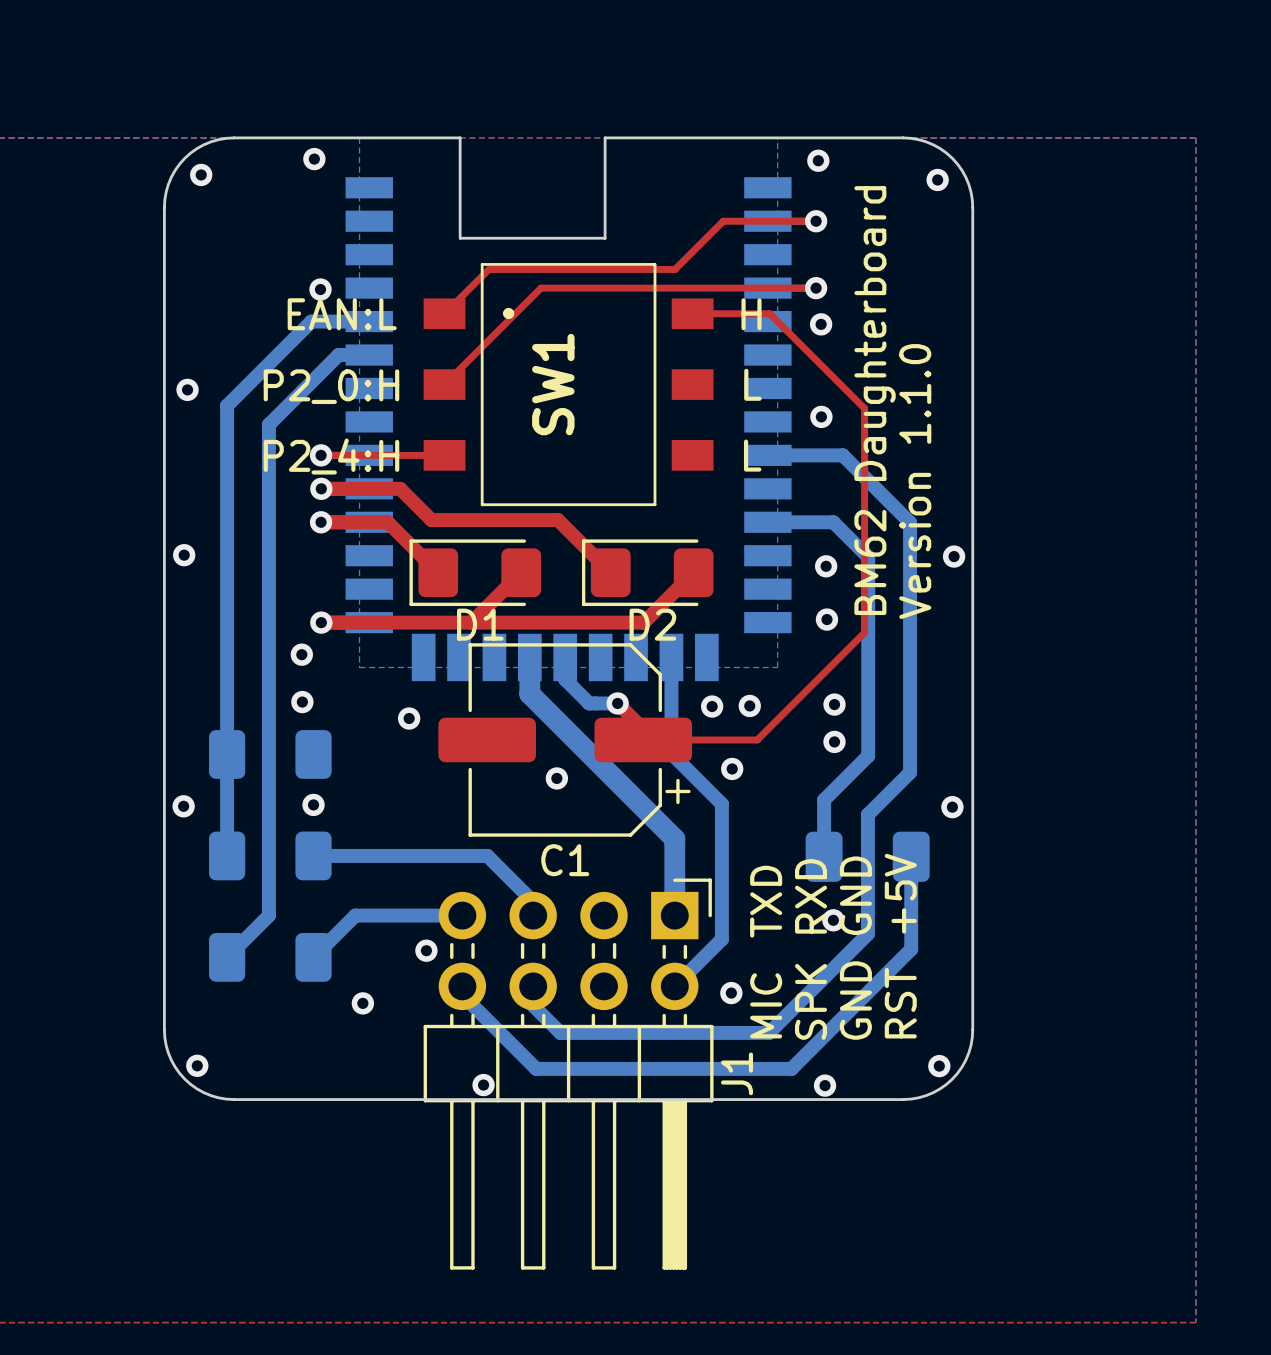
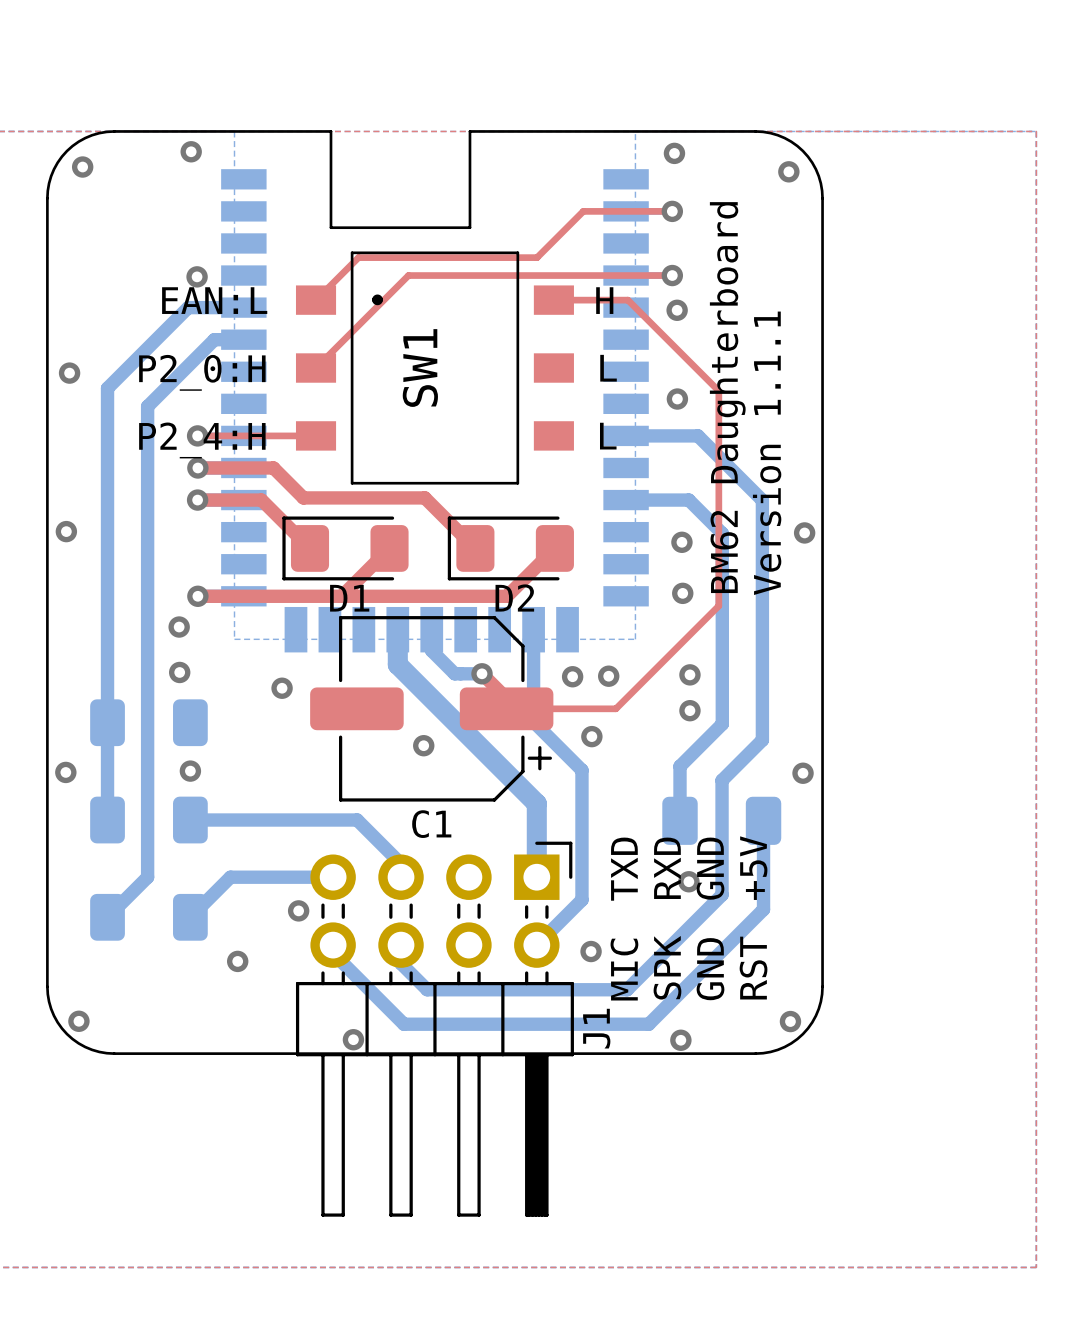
text: Version 1.1.0 (915, 481) -> Version 1.1.1 (767, 453)

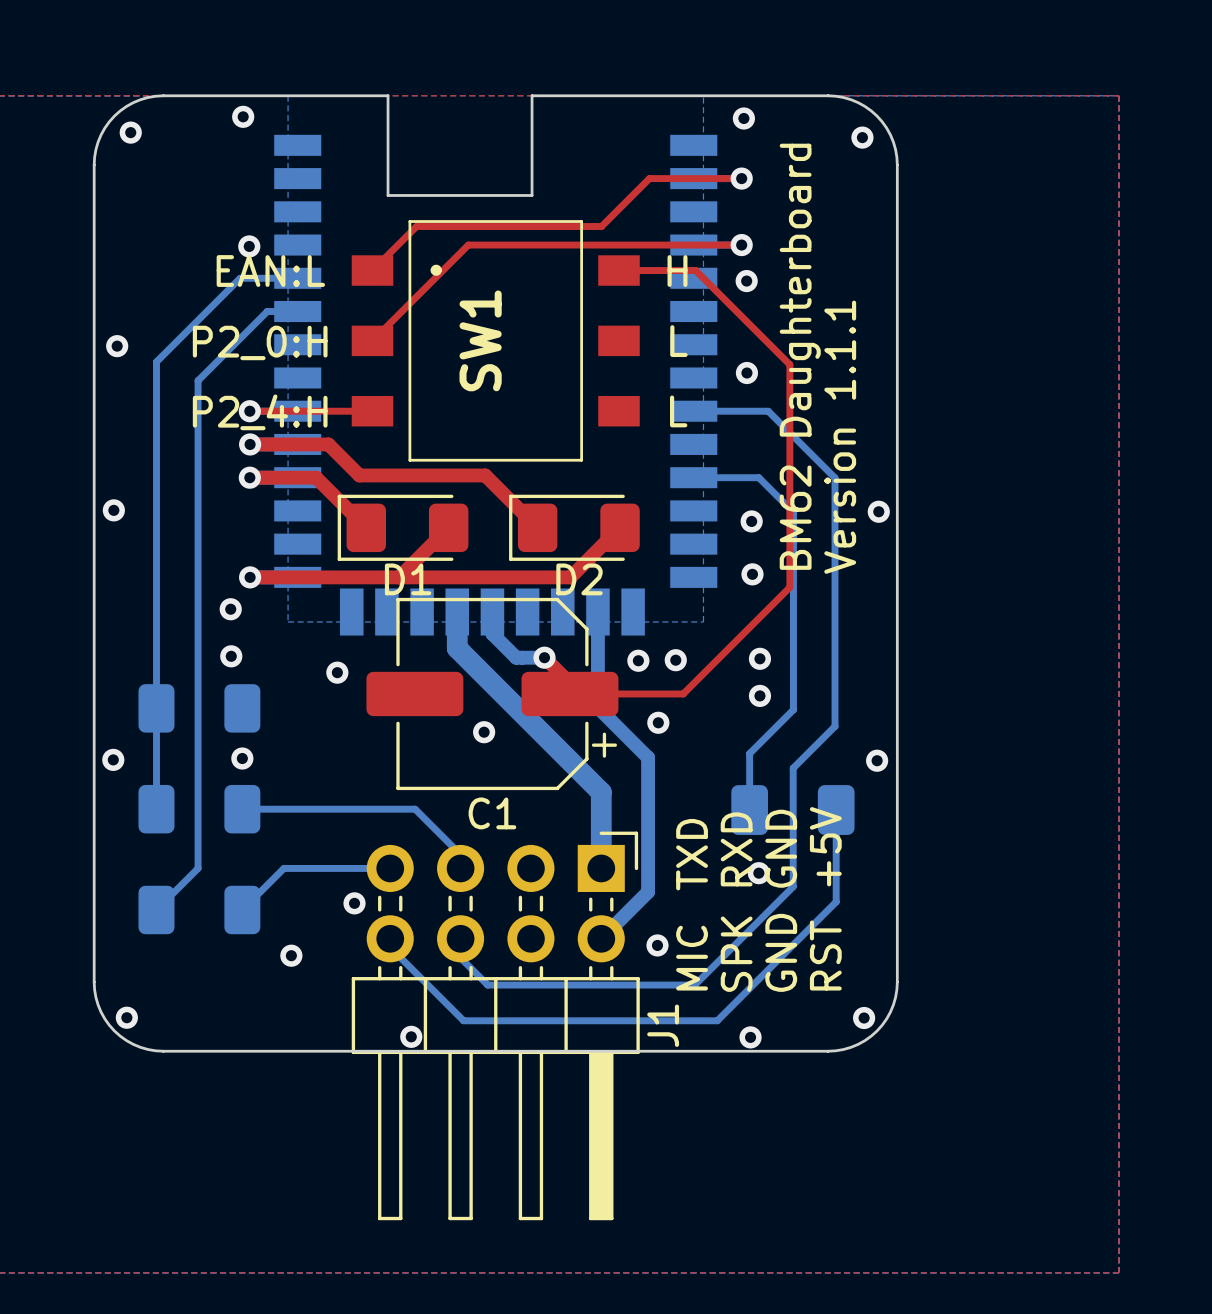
bottom track width: thick (243, 307) (188, 307) (107, 388) (107, 820) -> thin (297, 278) (240, 278) (156, 361) (156, 809)
bottom track width: thick (243, 339) (214, 339) (147, 406) (147, 877) (107, 917) -> thin (297, 311) (267, 311) (198, 380) (198, 868) (156, 910)
bottom track width: thick (626, 435) (697, 435) (762, 500) (762, 740) (722, 780) (722, 894) (627, 989) (427, 989) (401, 963) (401, 945) -> thin (693, 411) (768, 411) (835, 477) (835, 726) (793, 768) (793, 886) (694, 985) (487, 985) (460, 957) (460, 938)
bottom track width: thick (626, 500) (688, 500) (722, 533) (722, 724) (680, 766) (680, 820) -> thin (693, 477) (758, 477) (793, 512) (793, 709) (749, 753) (749, 810)
bottom track width: thick (190, 820) (357, 820) (401, 863) (401, 877) -> thin (242, 809) (415, 809) (460, 854) (460, 868)
bottom track width: thick (763, 820) (763, 909) (648, 1024) (403, 1024) (333, 953) (333, 945) -> thin (836, 810) (836, 901) (717, 1020) (463, 1020) (390, 947) (390, 938)
bottom track width: thick (333, 877) (230, 877) (190, 917) -> thin (390, 868) (283, 868) (242, 910)

